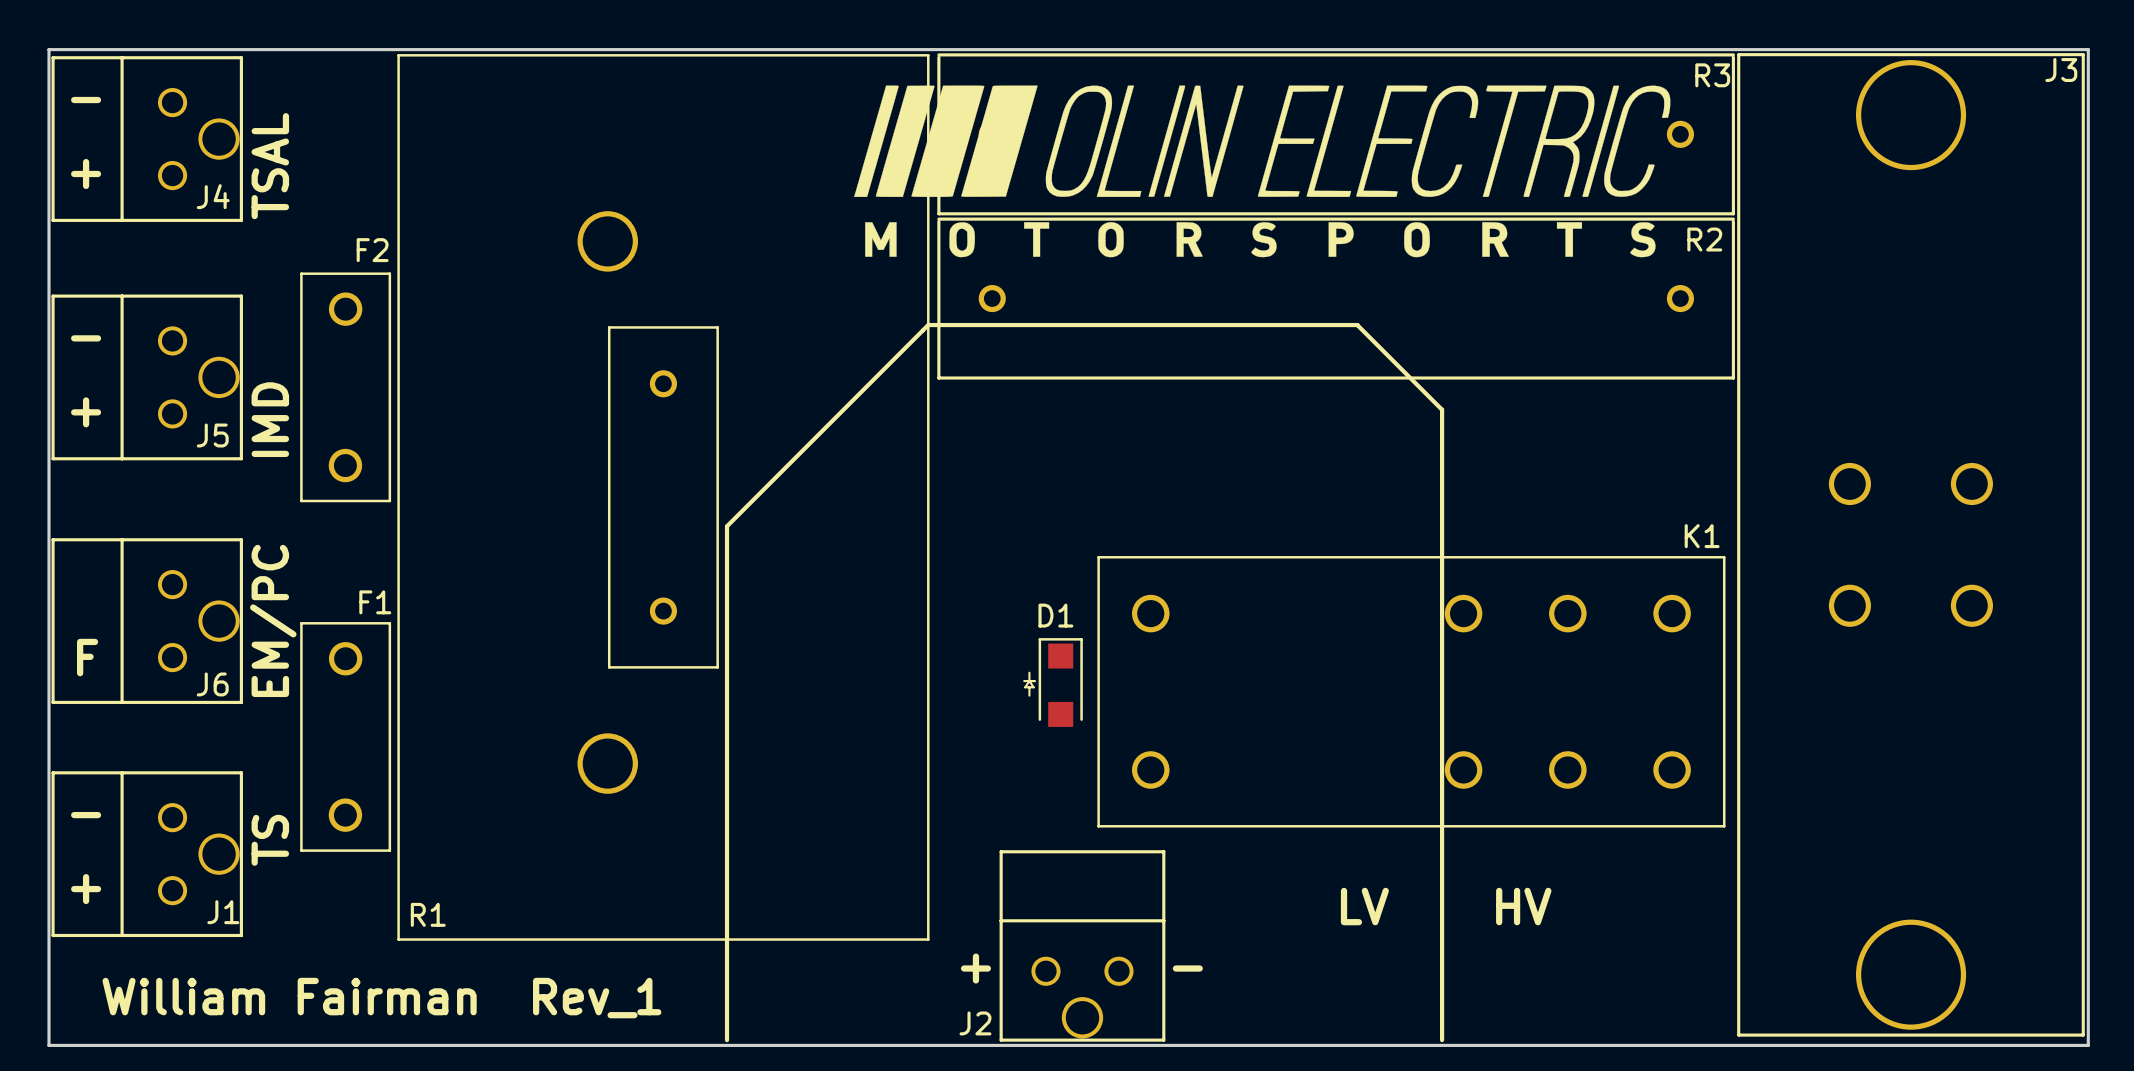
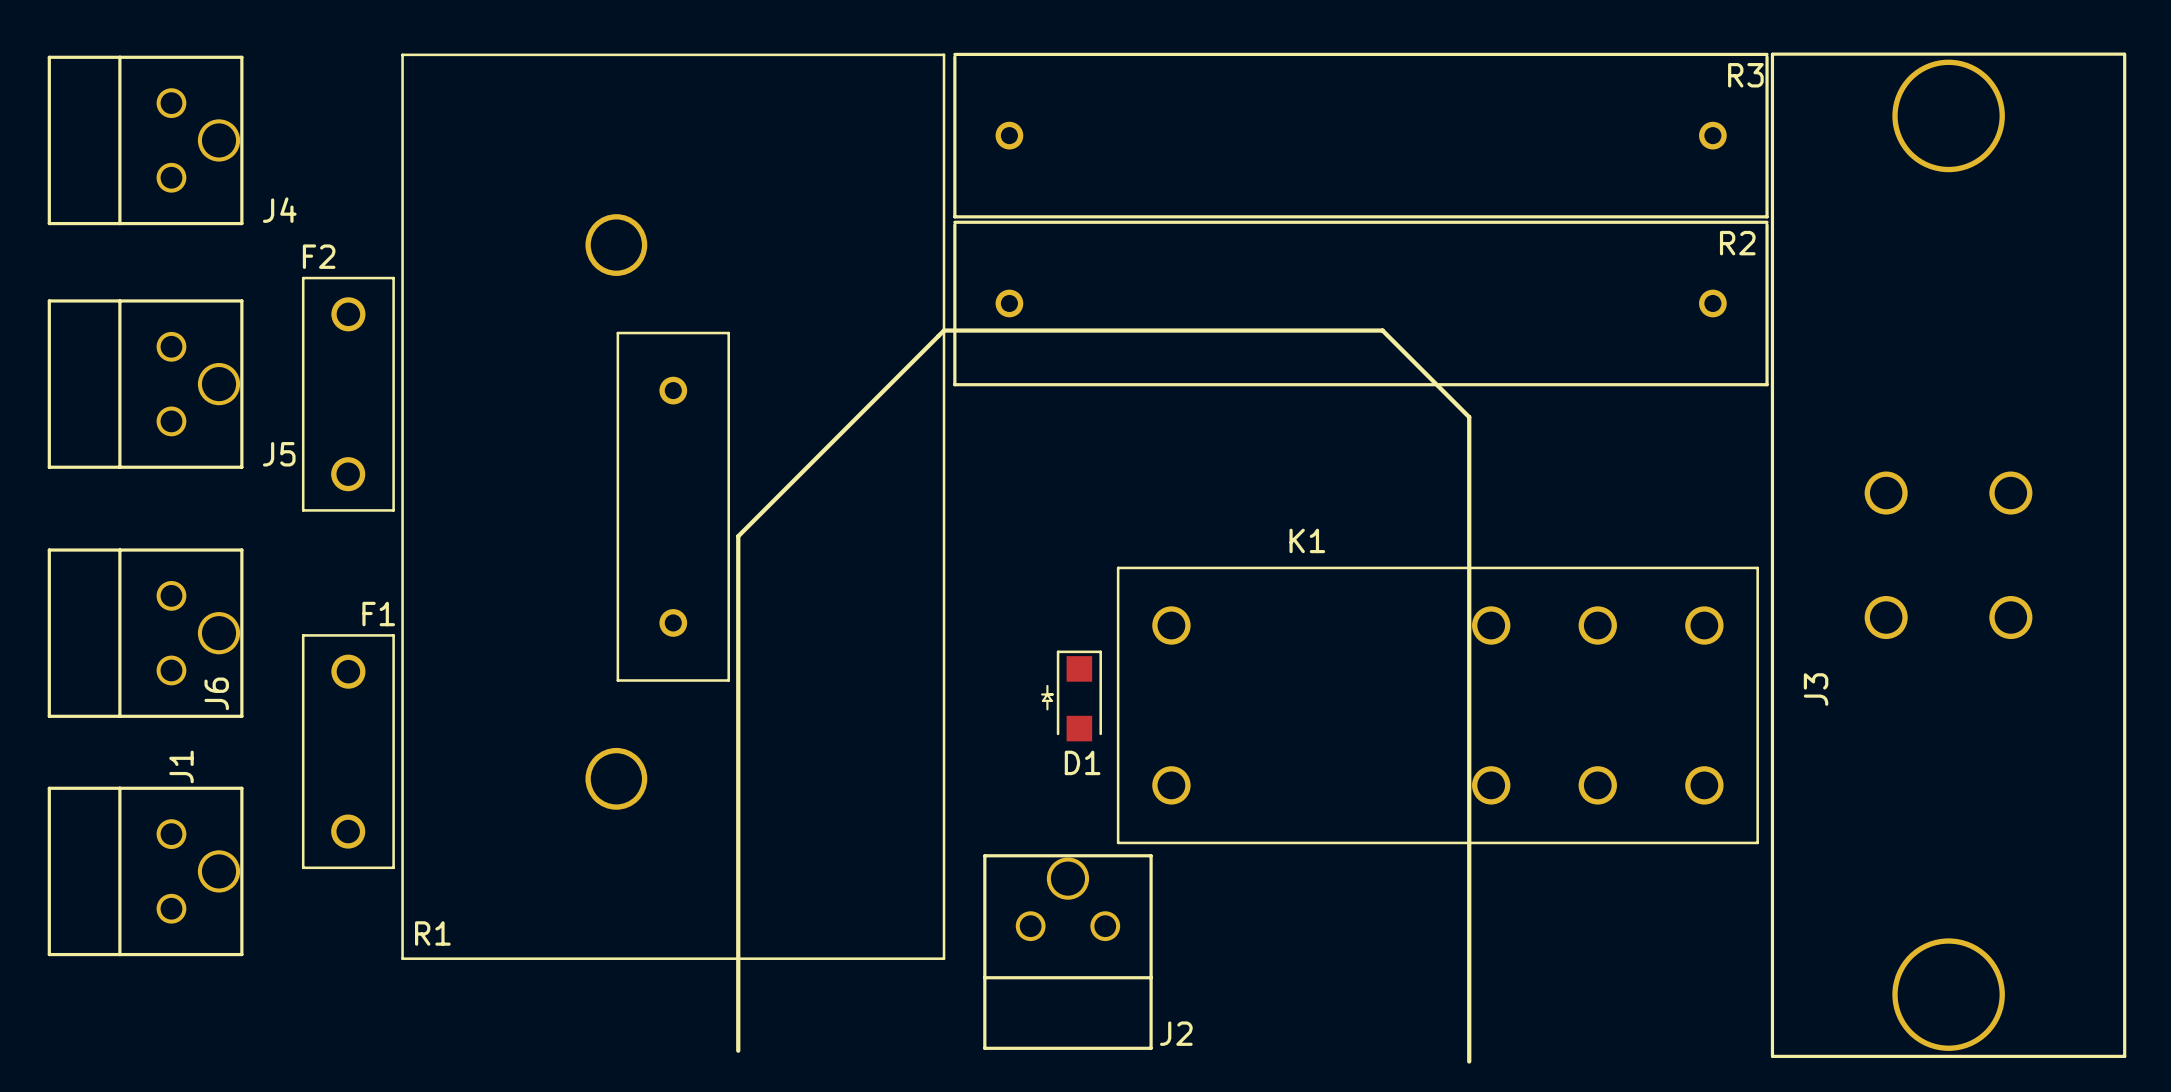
board edge: (49, 49) (2088, 49) (2088, 1045) (49, 1045) (49, 49) -> none
J3 name rotation: 0° (2061, 70) -> 90° counterclockwise (1816, 689)
J3 name position: J3 (2061, 70) -> J3 (1816, 689)
drawing: [854, 85, 1671, 258] -> none
text: - (86, 100) -> none
text: TSAL (270, 166) -> none
text: + (86, 173) -> none
J4 name position: J4 (213, 196) -> J4 (279, 210)
F2 name position: F2 (372, 250) -> F2 (319, 256)
text: - (86, 338) -> none
text: + (86, 412) -> none
text: IMD (270, 419) -> none
J5 name position: J5 (212, 435) -> J5 (279, 454)
K1 name position: K1 (1702, 536) -> K1 (1307, 540)
D1 name position: D1 (1055, 615) -> D1 (1082, 762)
text: EM/PC (273, 620) -> none
text: F (87, 657) -> none
J6 name rotation: 0° (212, 684) -> 90° counterclockwise (216, 693)
text: - (86, 815) -> none
text: TS (270, 840) -> none
text: + (86, 889) -> none
text: LV (1364, 906) -> none
text: HV (1523, 906) -> none
J1 name rotation: 0° (223, 912) -> 90° counterclockwise (181, 766)
J1 name position: J1 (223, 912) -> J1 (181, 766)
J2 rotation: 0° (1082, 945) -> 180° (1067, 952)
text: + (975, 968) -> none
text: - (1187, 968) -> none
text: William Fairman Rev_1 (381, 998) -> none
J2 name position: J2 (975, 1023) -> J2 (1176, 1033)
line: (727, 1029) (727, 1040) -> none

